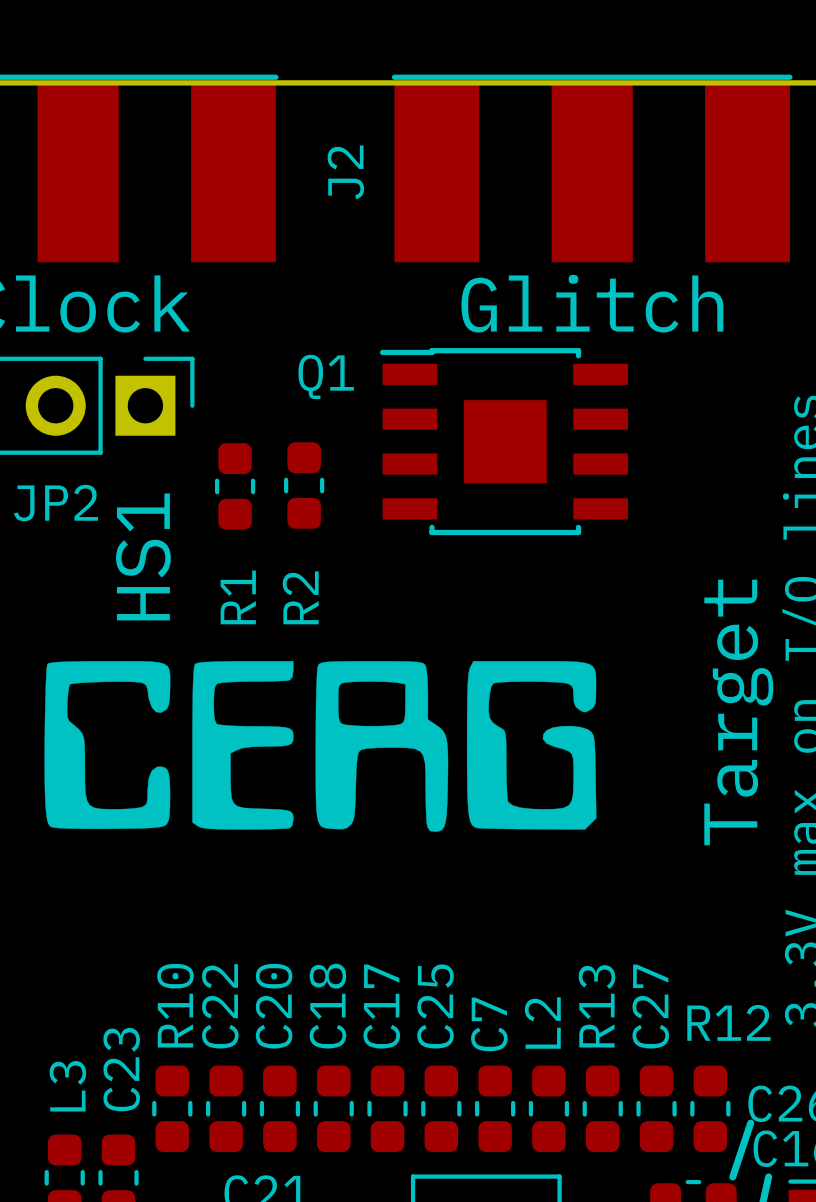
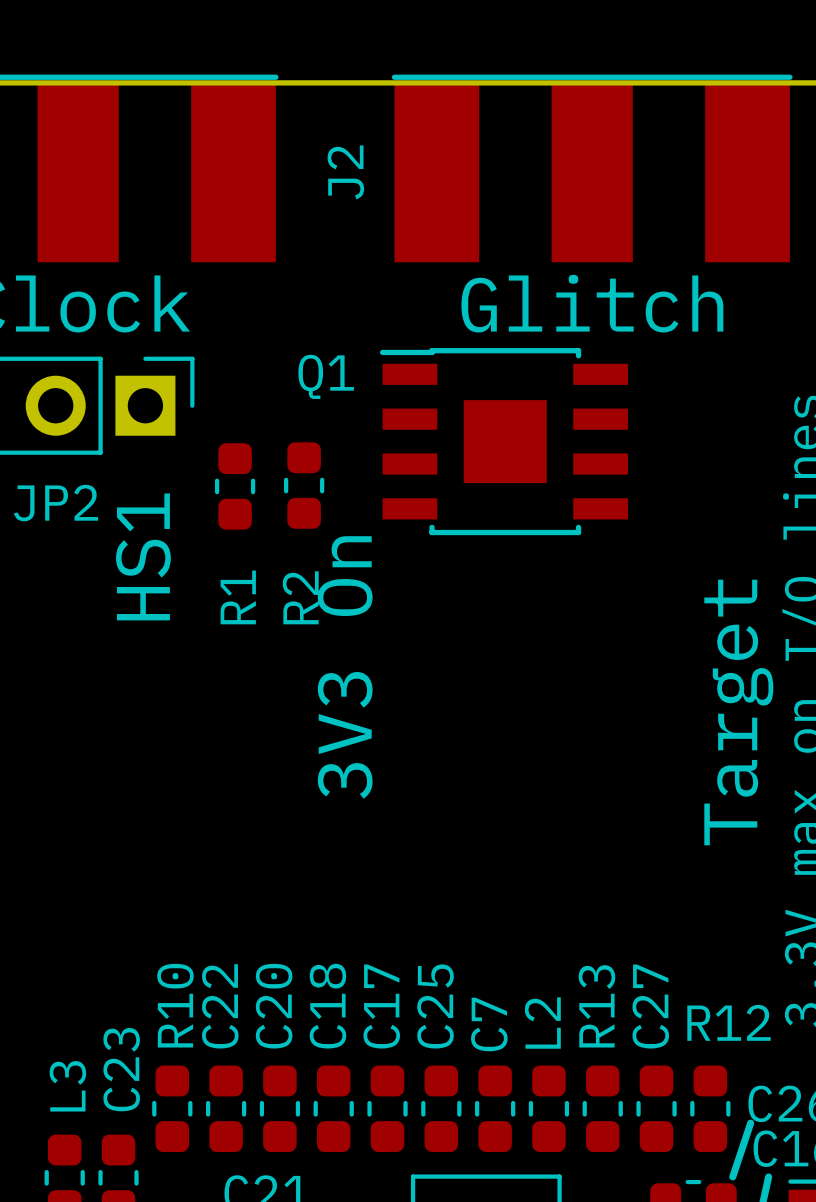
drawing: [44, 661, 597, 832] -> none
text: none -> 3V3 On (345, 667)

